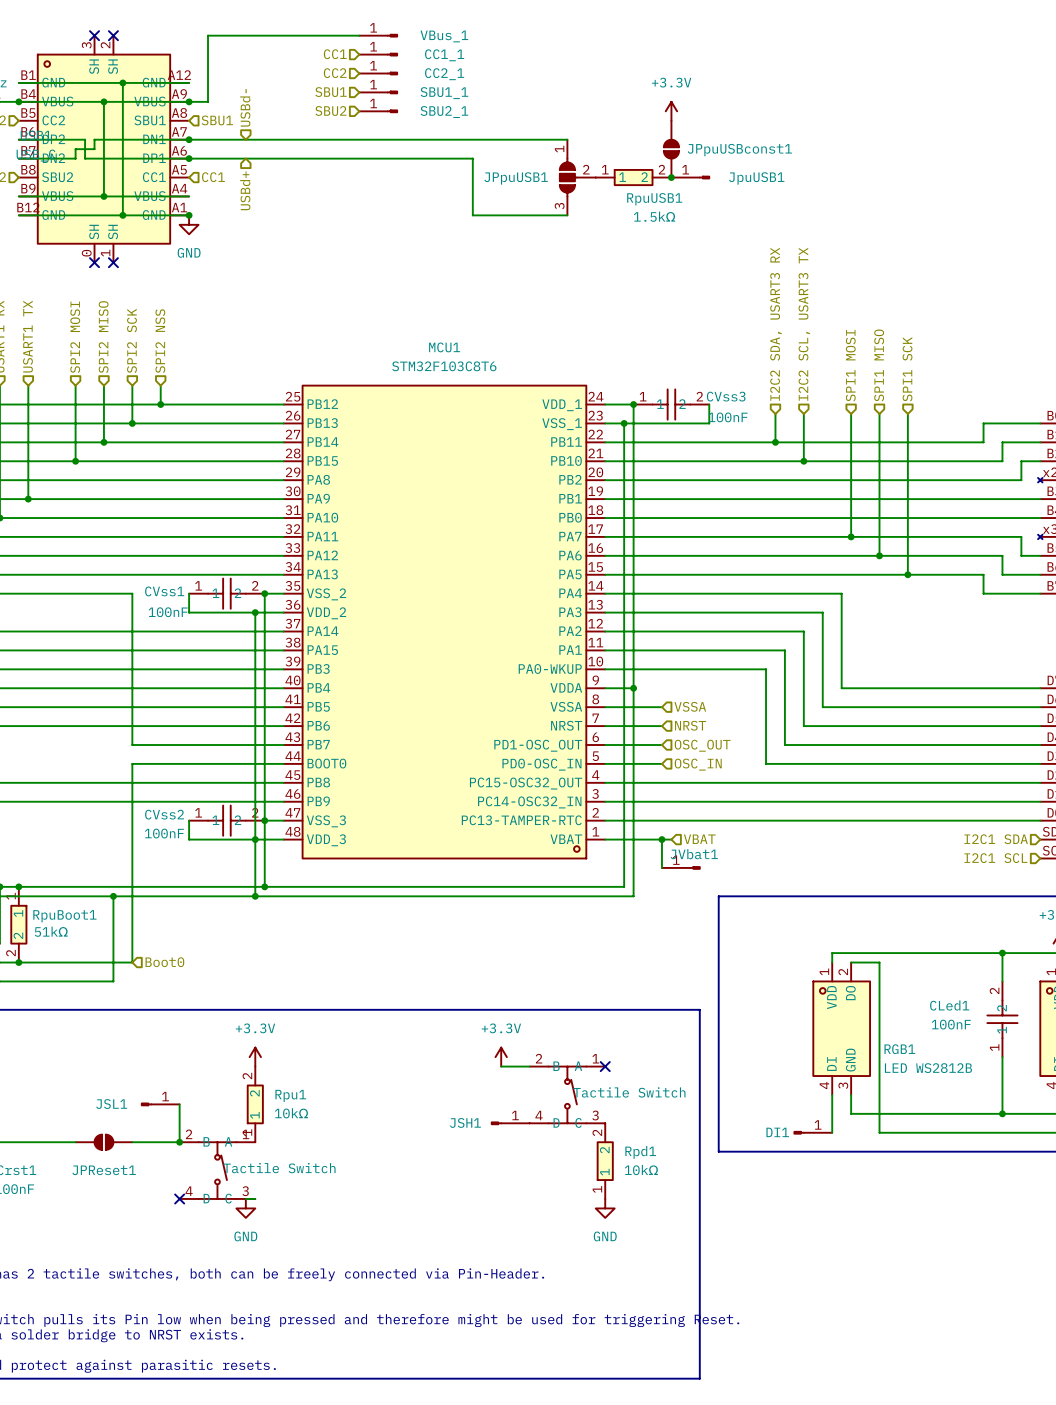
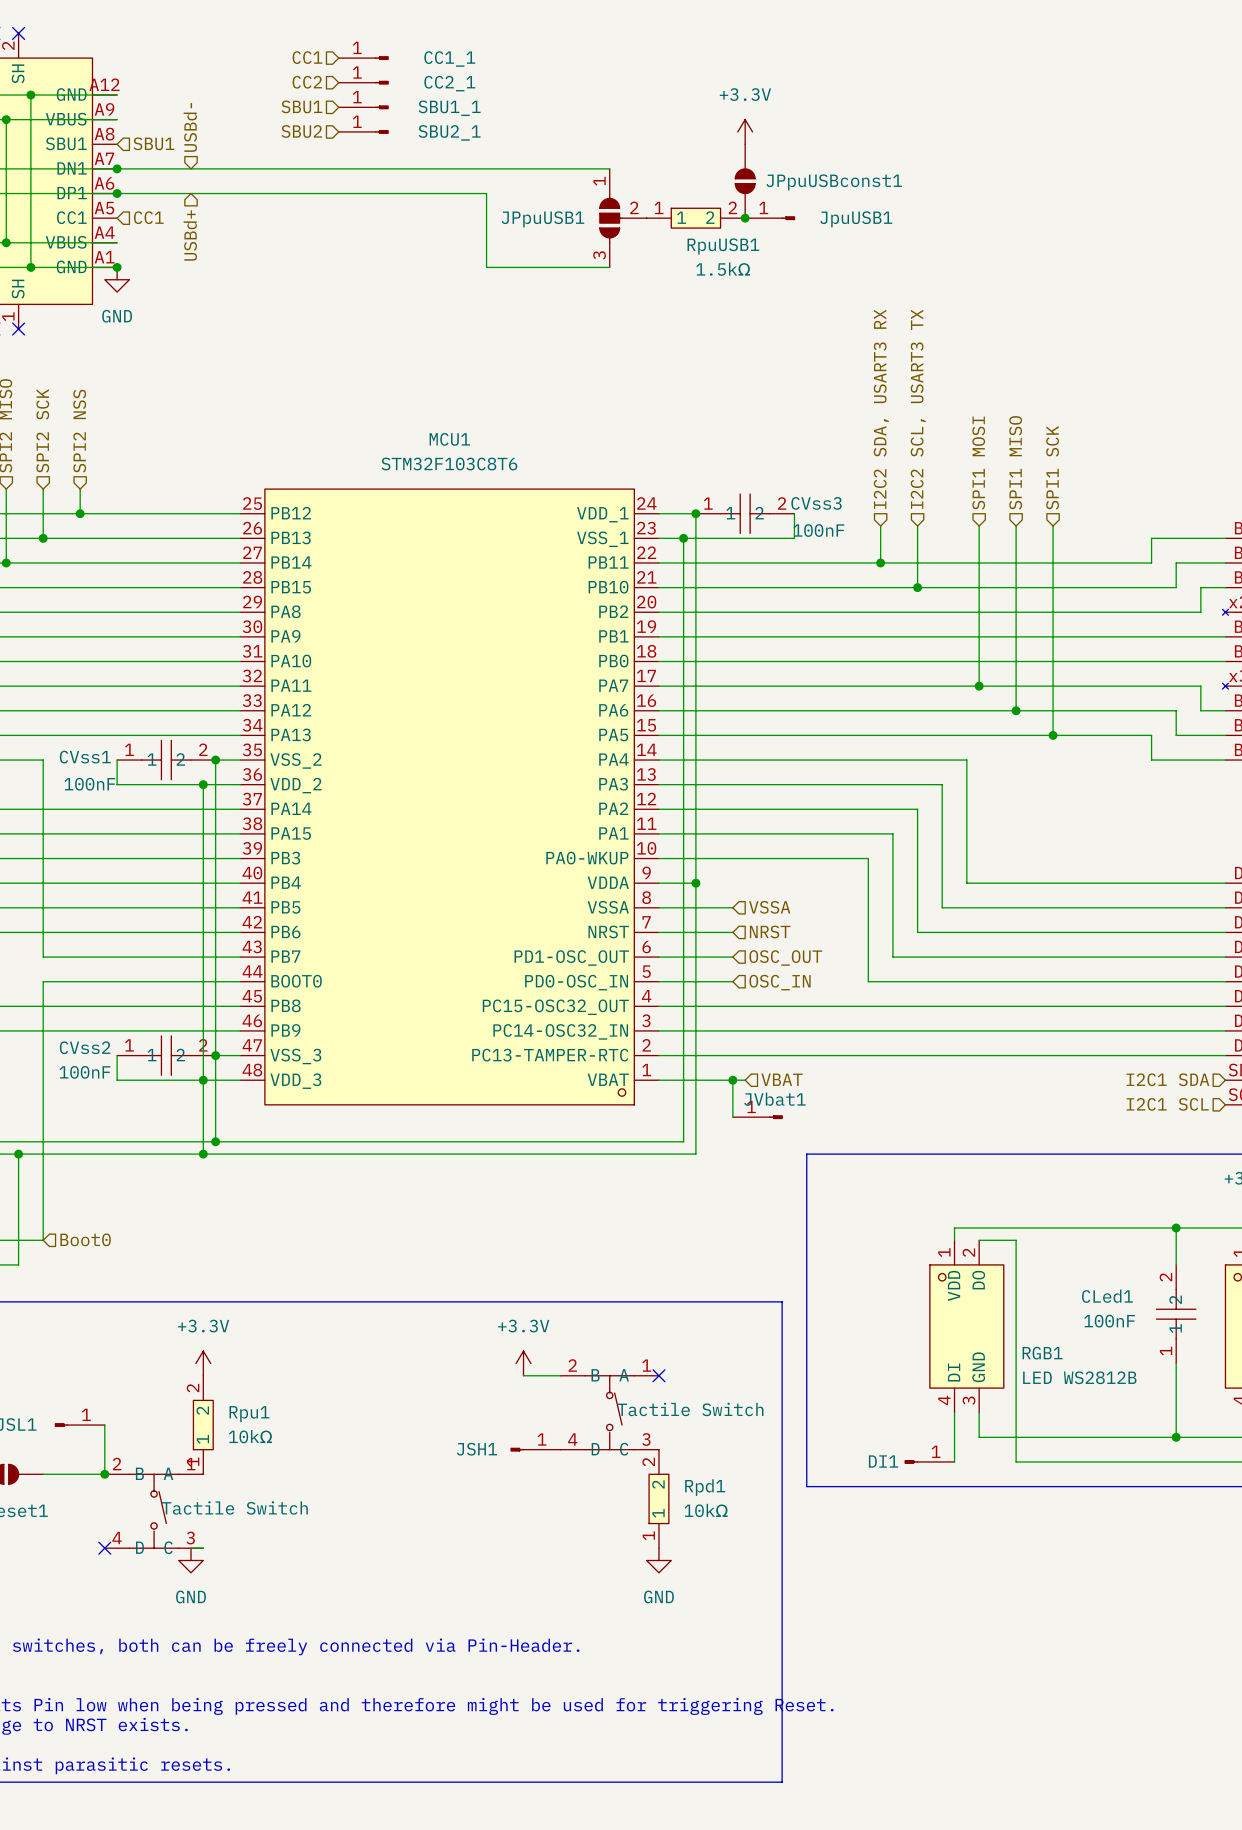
wire: (359, 35) (208, 35) (208, 101) (189, 101) -> none
VBus_1: (378, 35) -> none
junction: (189, 101) -> none

